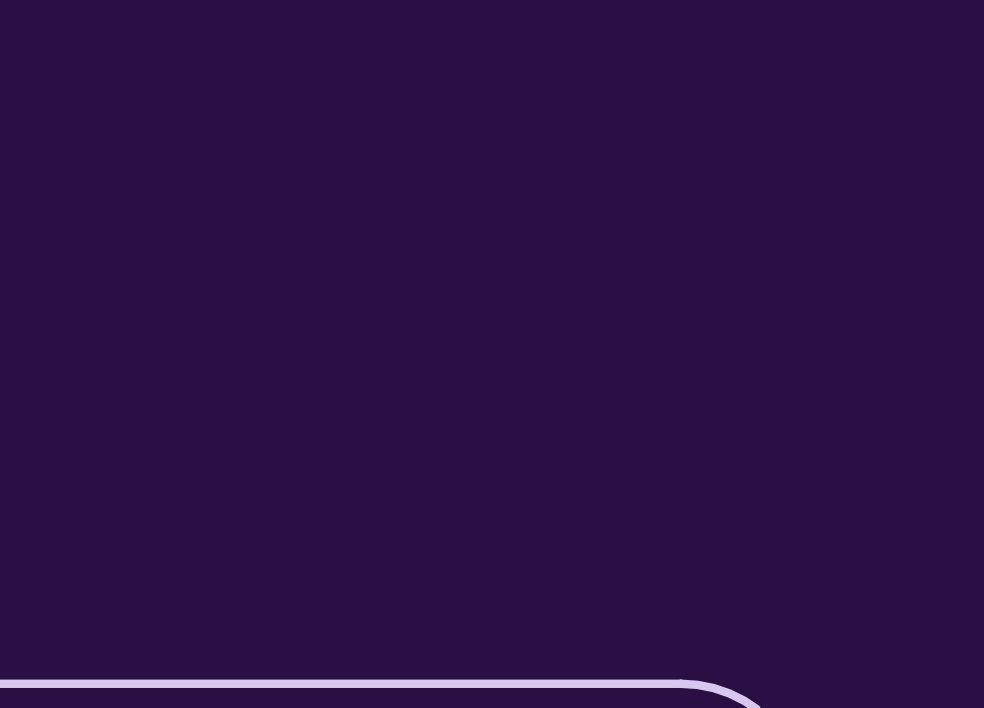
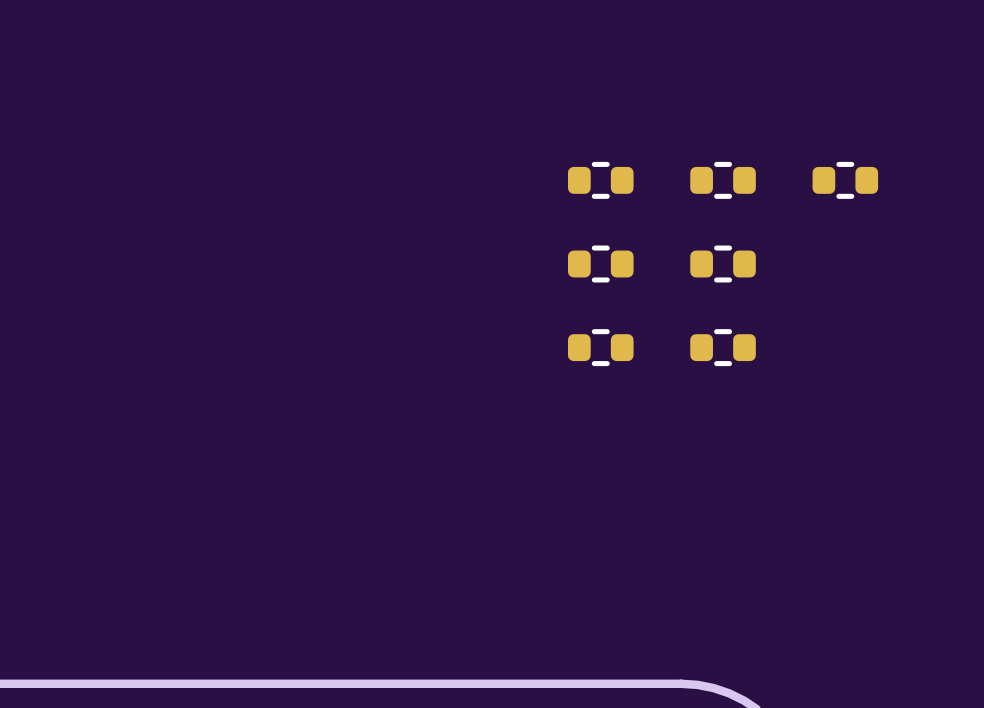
part: none -> (600, 180)
part: none -> (723, 180)
part: none -> (845, 180)
part: none -> (600, 264)
part: none -> (723, 264)
part: none -> (600, 347)
part: none -> (723, 347)

